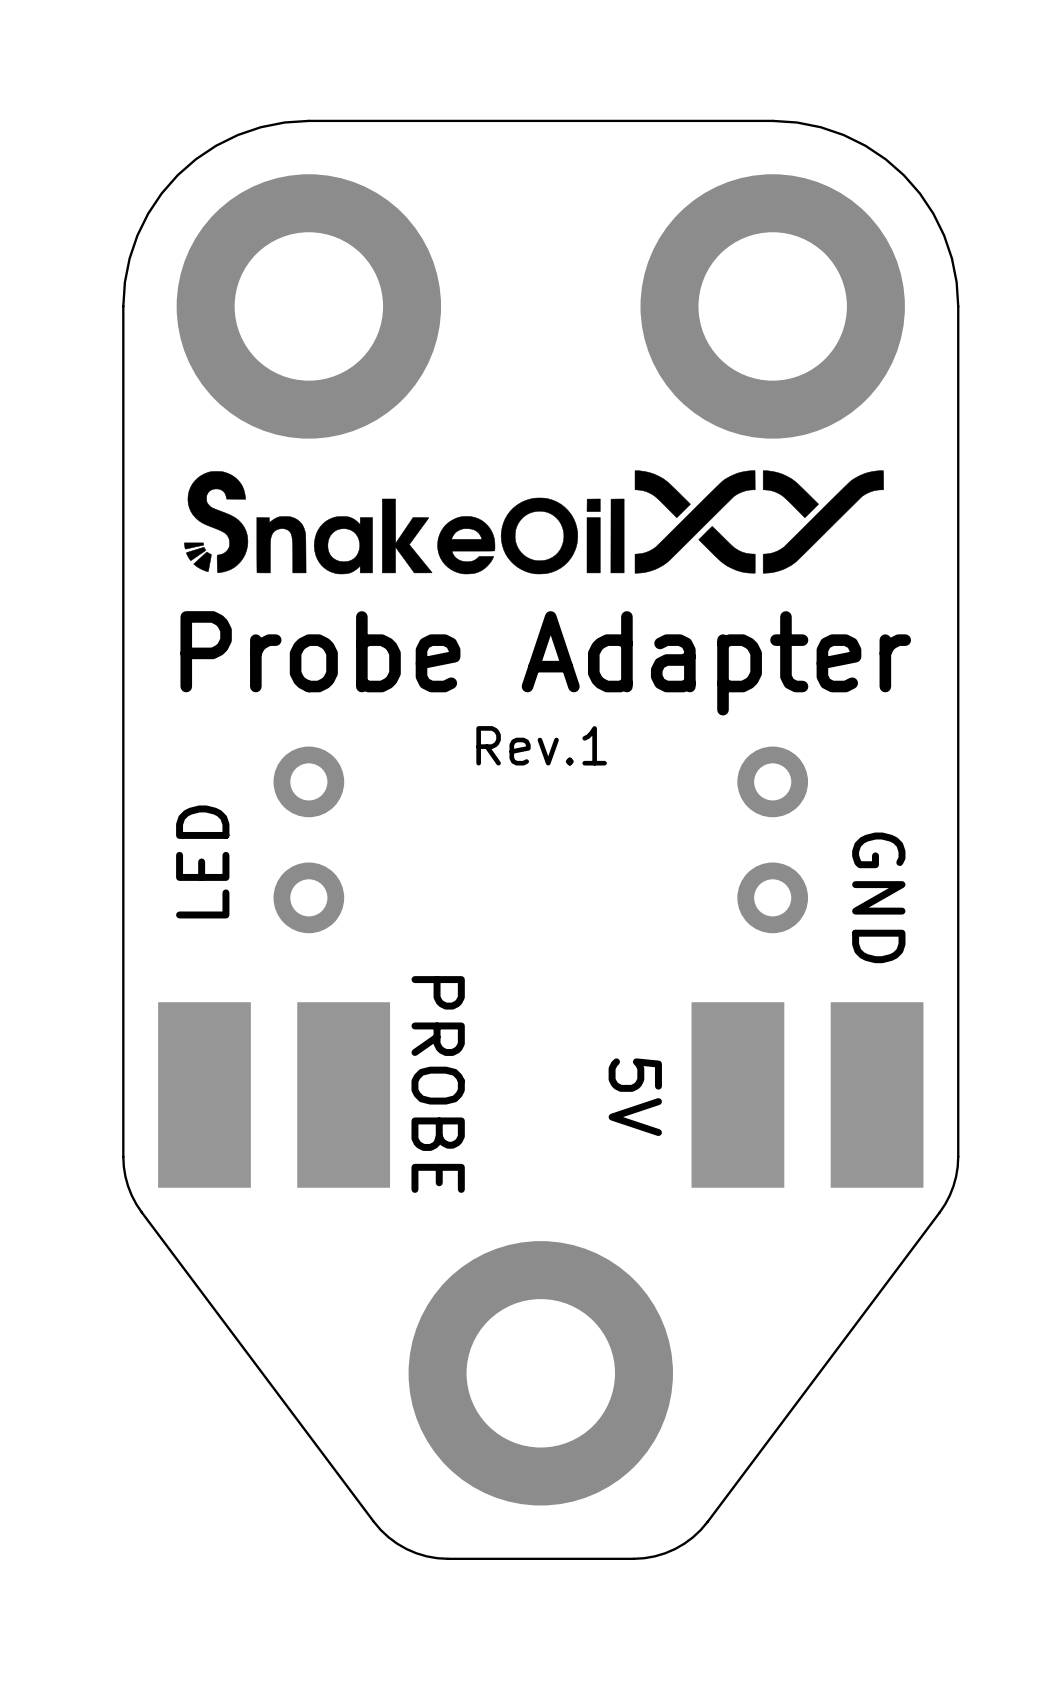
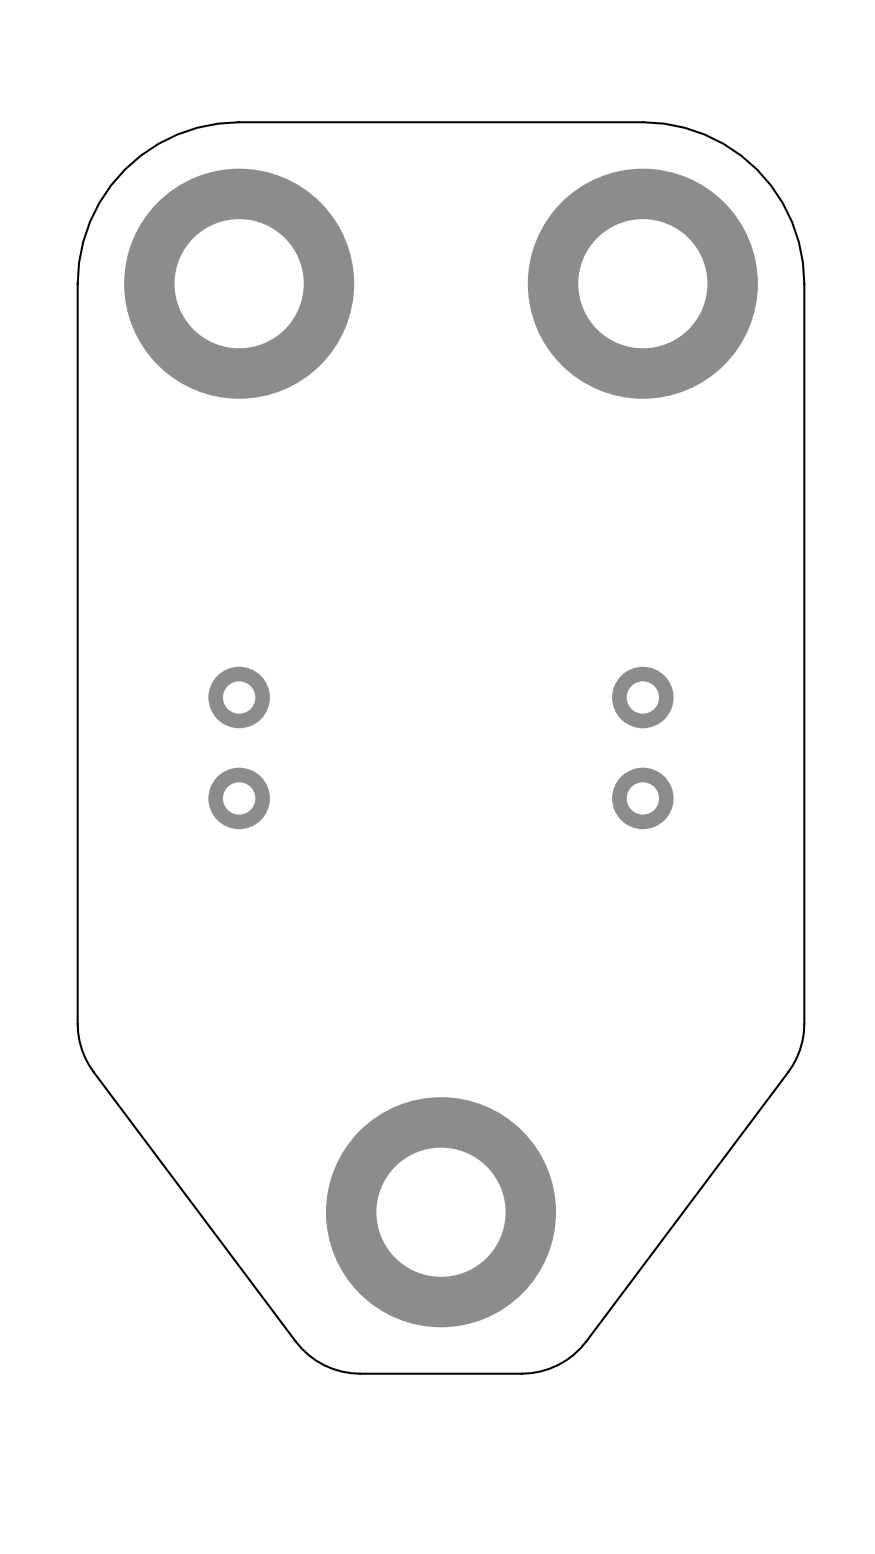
drawing: [184, 470, 884, 575] -> none
text: Probe Adapter (545, 663) -> none
text: Rev.1 (541, 745) -> none
text: LED (202, 861) -> none
text: GND (878, 897) -> none
text: PROBE (438, 1084) -> none
part: (204, 1094) -> none
part: (343, 1094) -> none
part: (737, 1094) -> none
part: (877, 1094) -> none
text: 5V (635, 1097) -> none

